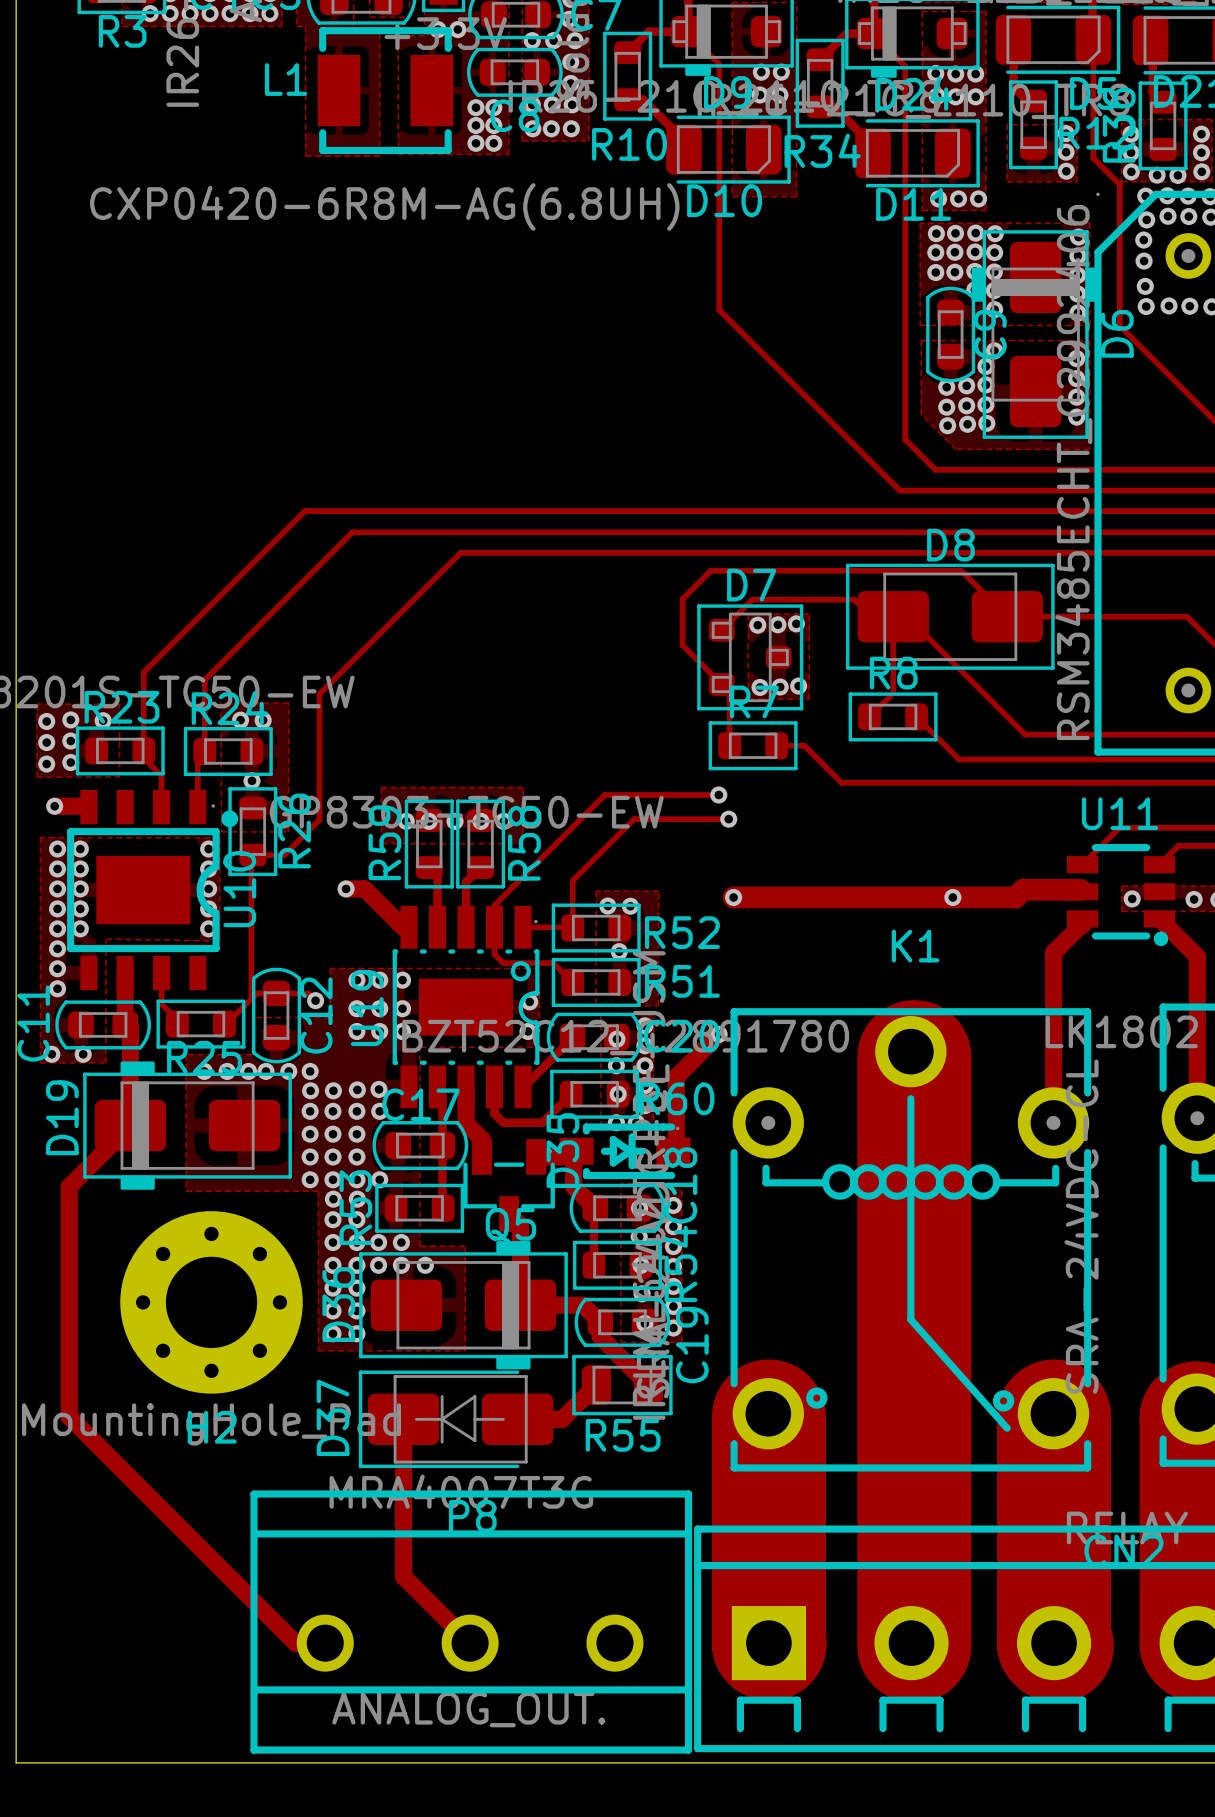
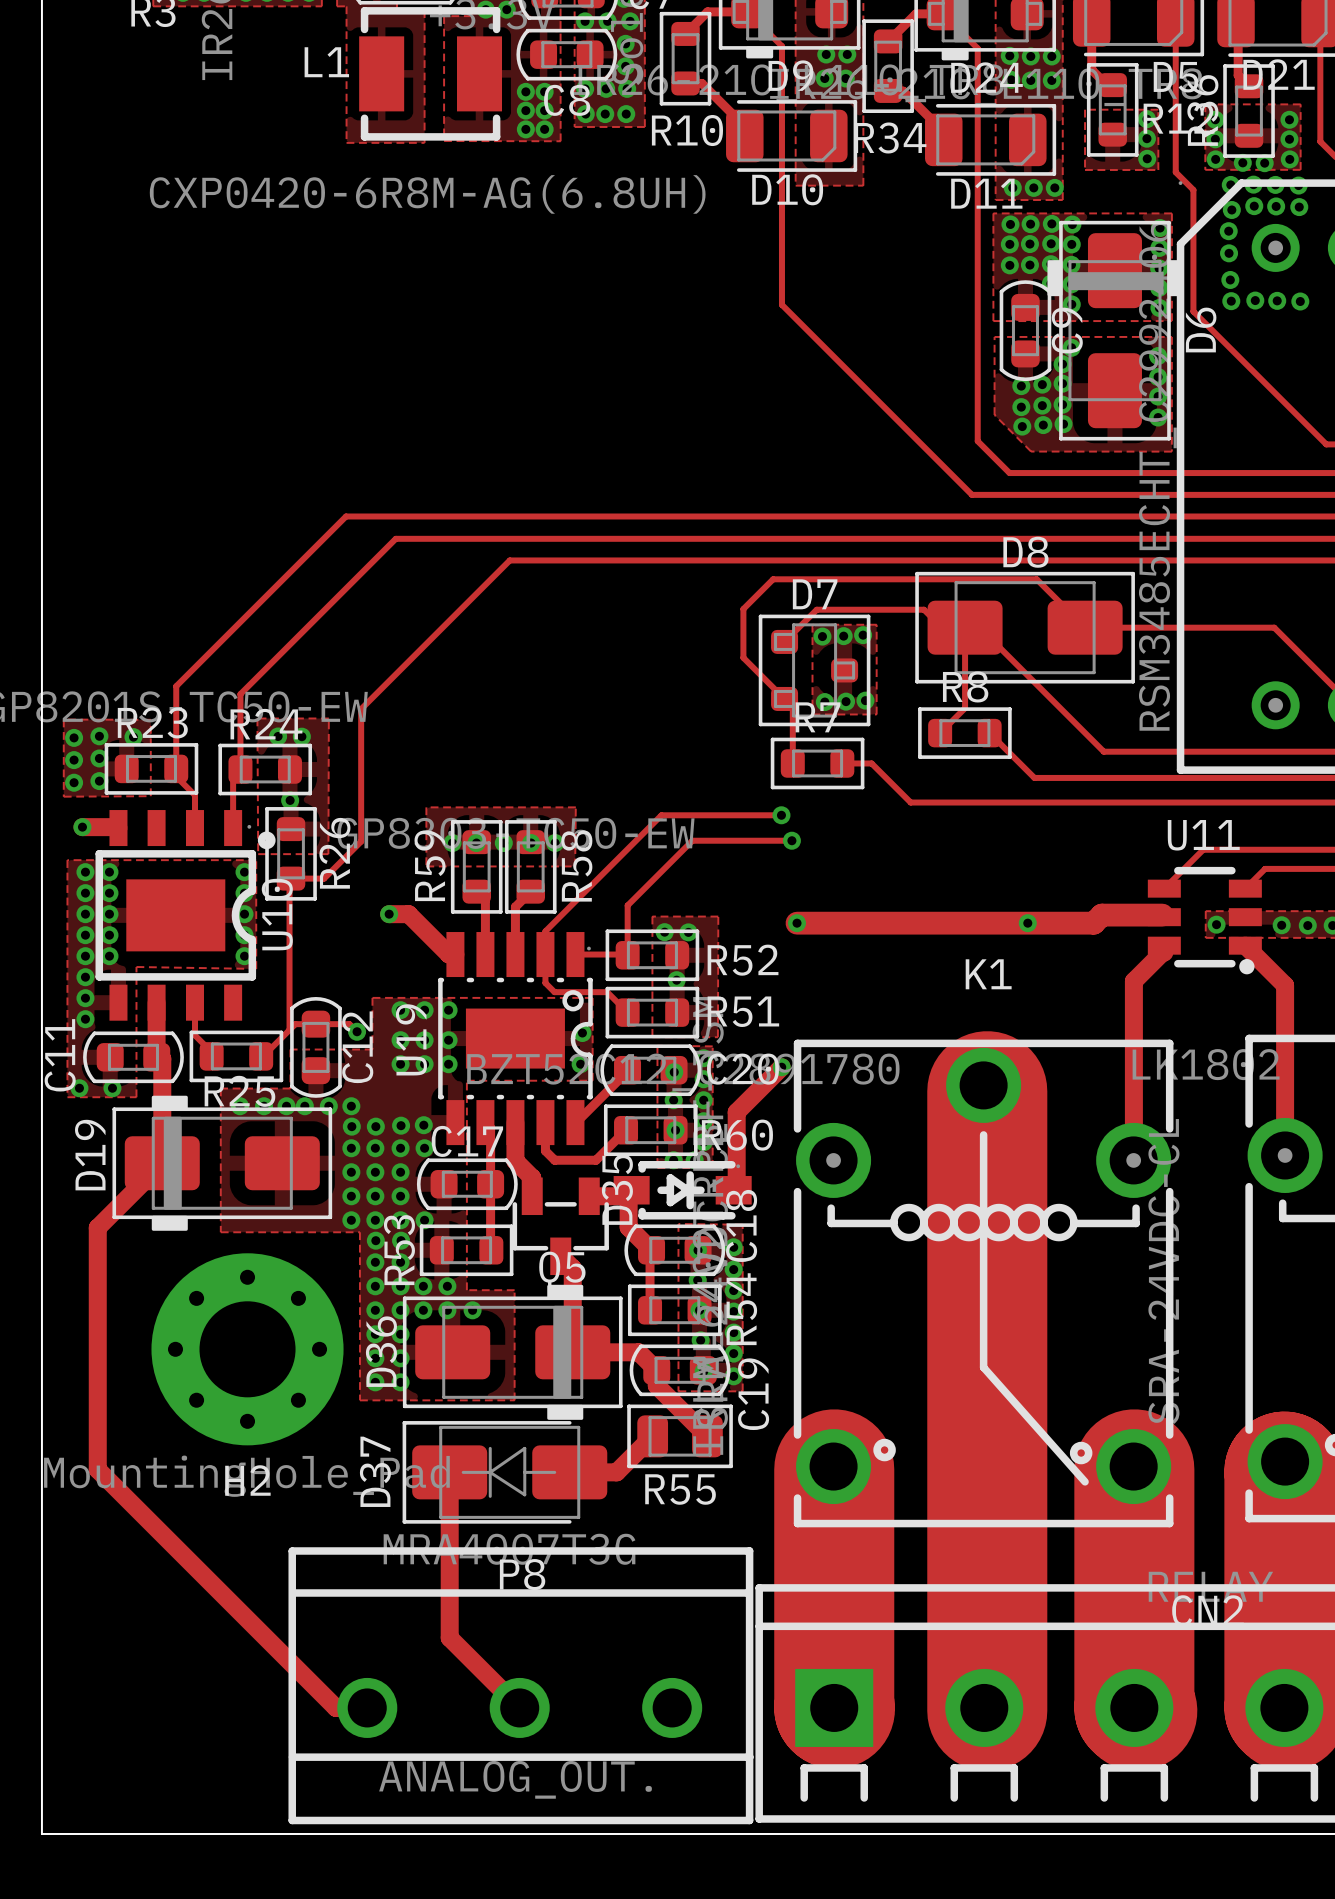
track: (1093, 158) (1119, 184) (1119, 325) -> (1175, 144) (1175, 172) (1193, 189) (1193, 311) (1203, 321)

